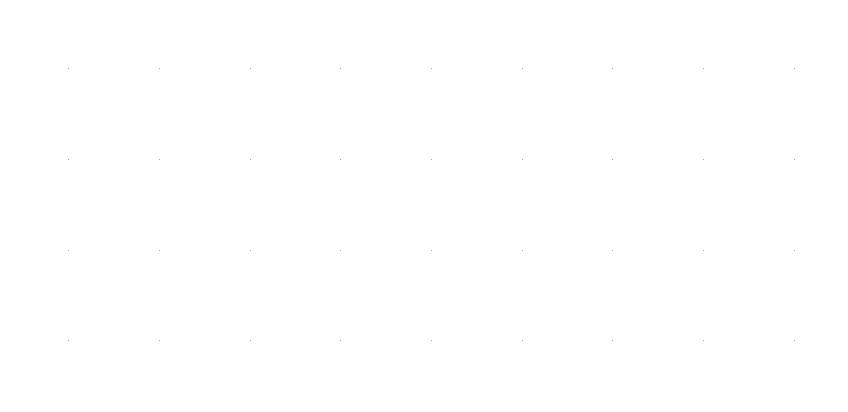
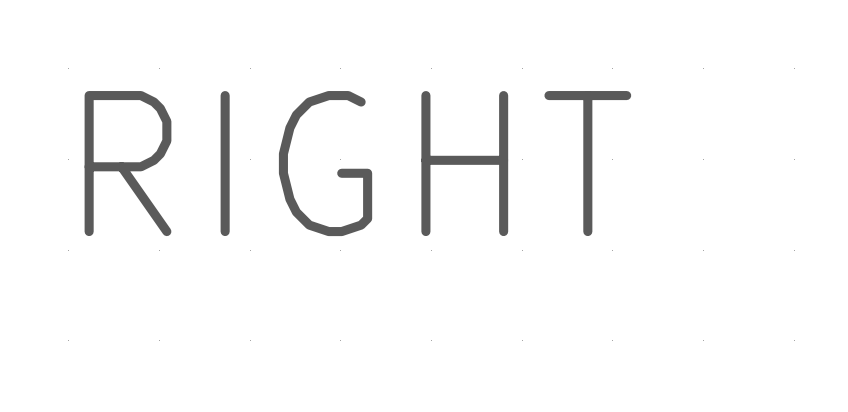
text: none -> RIGHT (357, 163)

